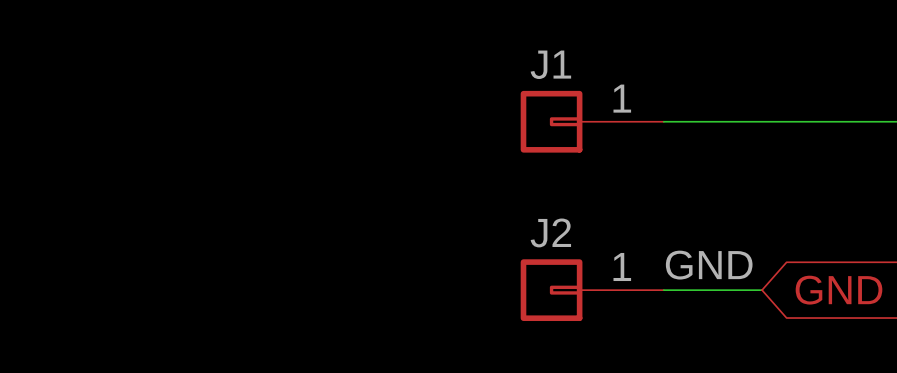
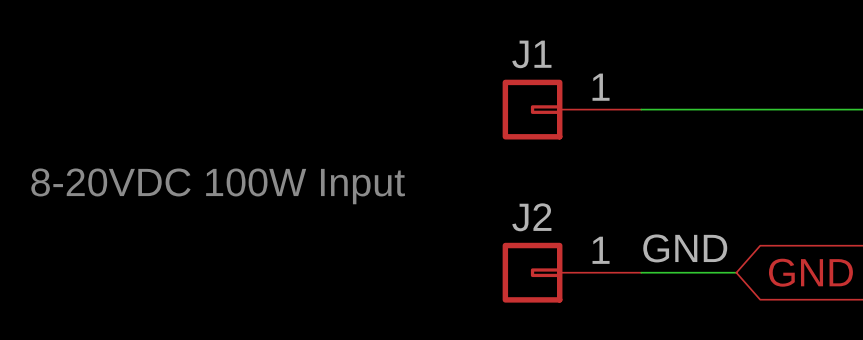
text: none -> 8-20VDC 100W Input (218, 186)

